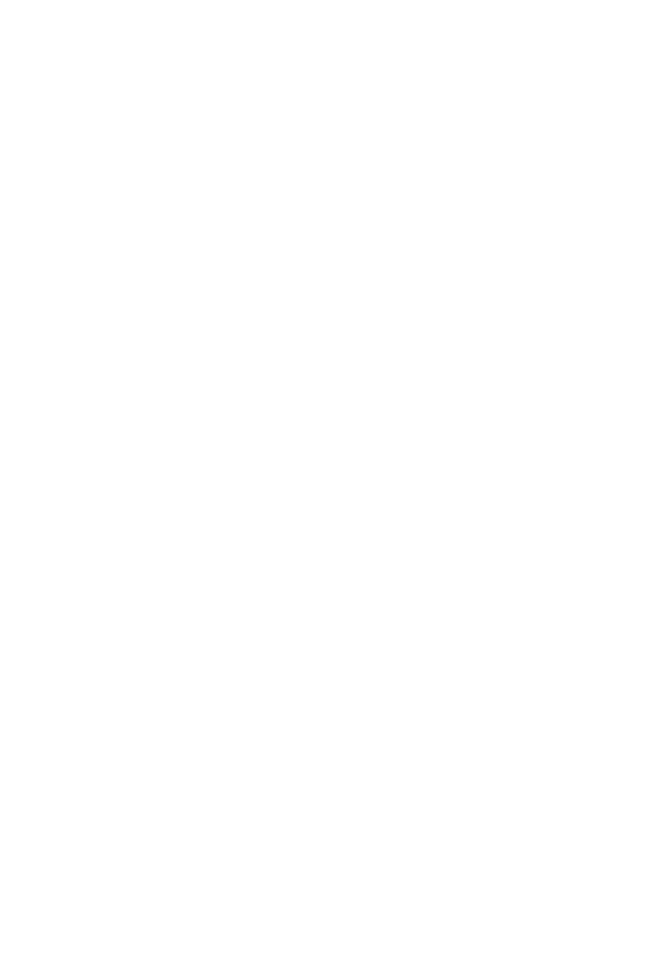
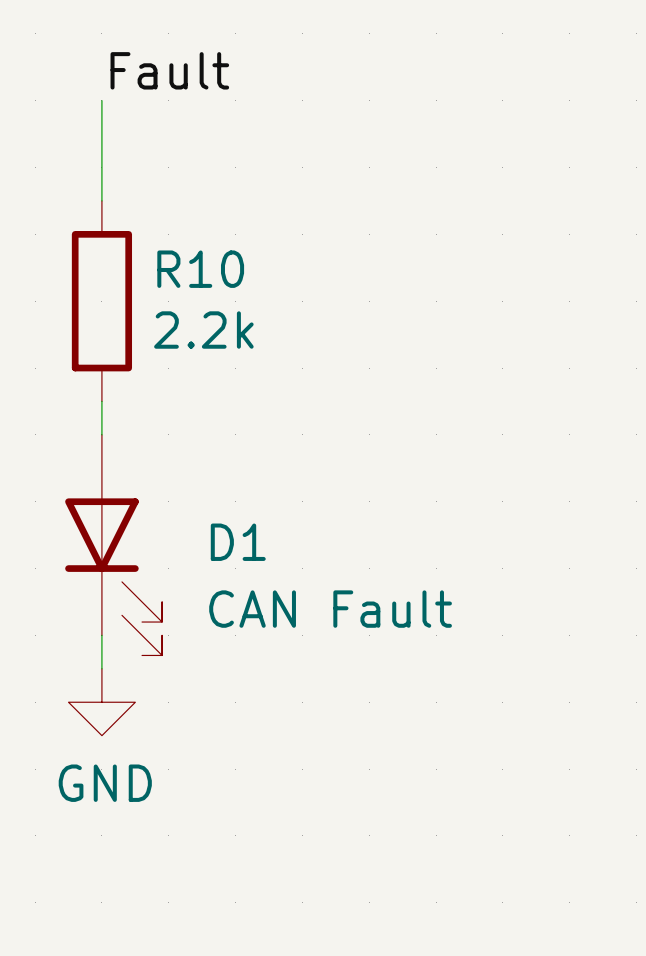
label: none -> Fault (169, 70)
wire: none -> (101, 100) (101, 200)
R10: none -> 2.2k (101, 301)
wire: none -> (101, 401) (101, 434)
D1: none -> CAN Fault (113, 545)
wire: none -> (101, 635) (101, 668)
power symbol: none -> GND (101, 702)

